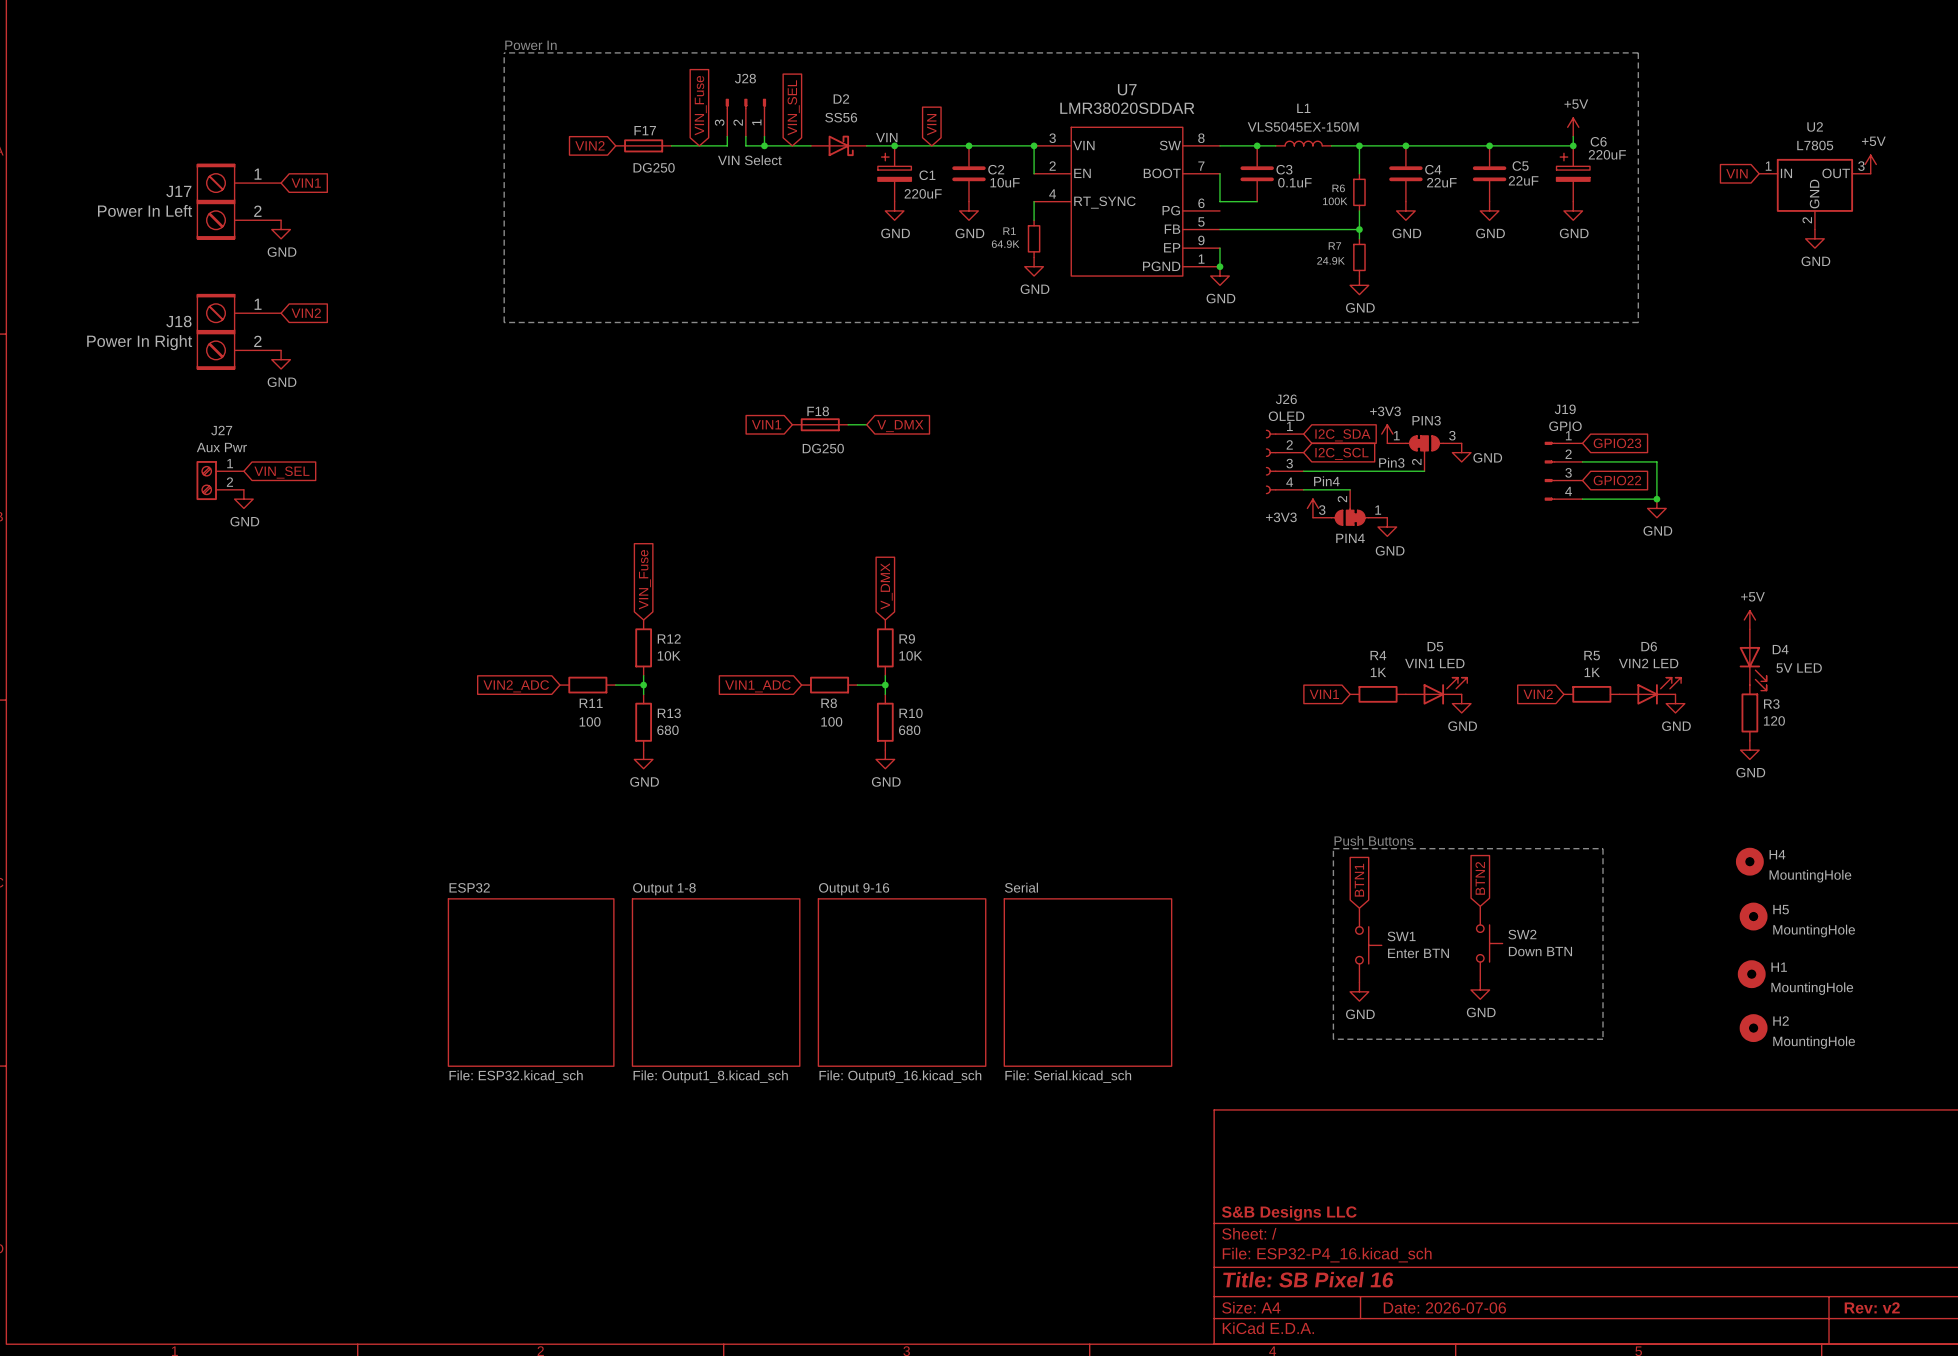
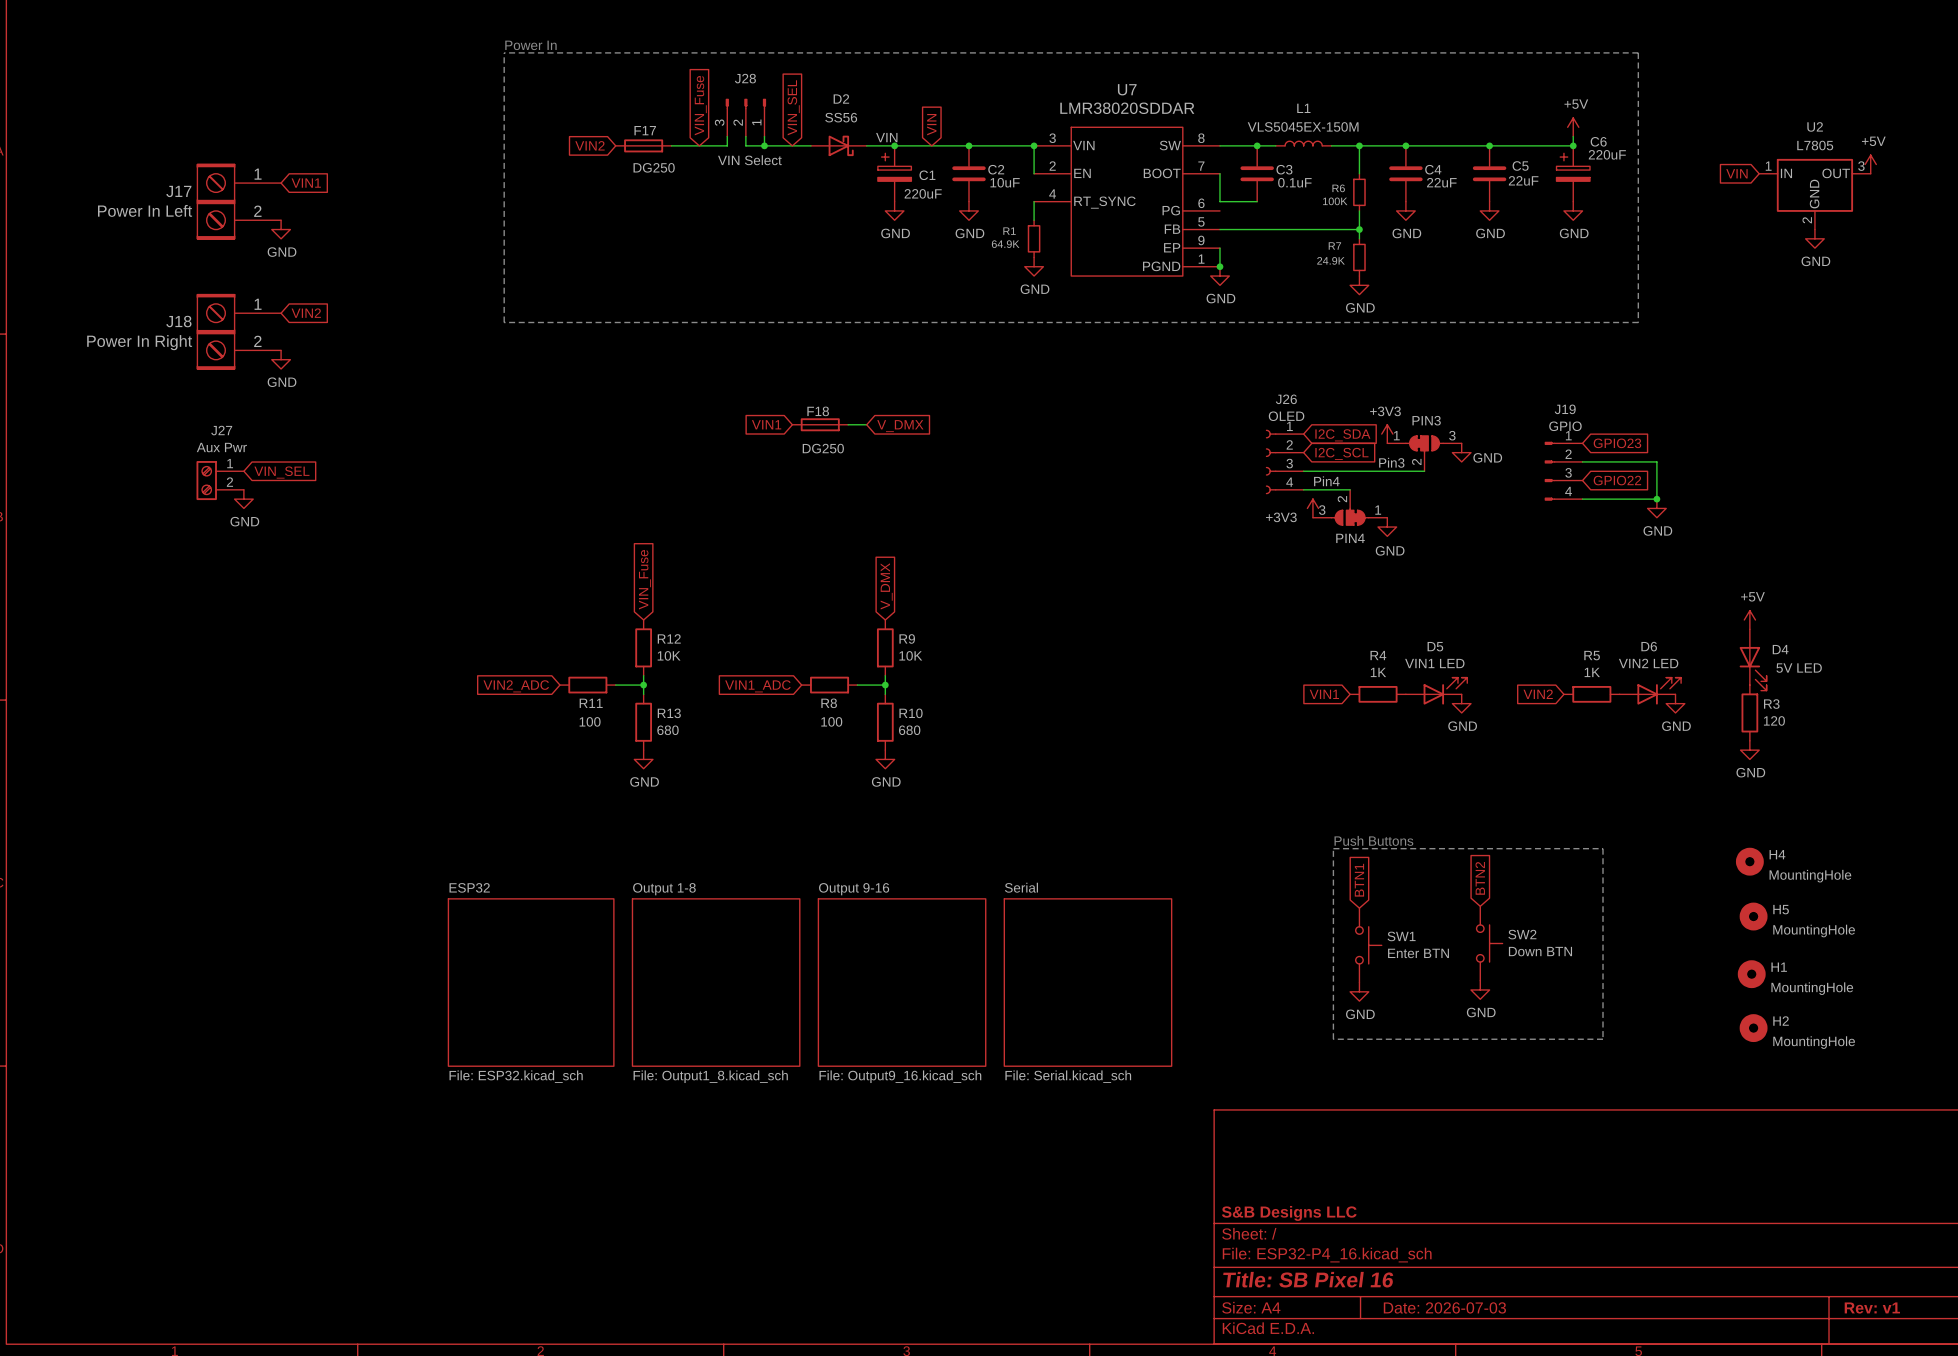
title block: Date: 2026-07-06 (1444, 1307) -> Date: 2026-07-03 (1444, 1307)
title block: Rev: v2 (1872, 1307) -> Rev: v1 (1872, 1308)

